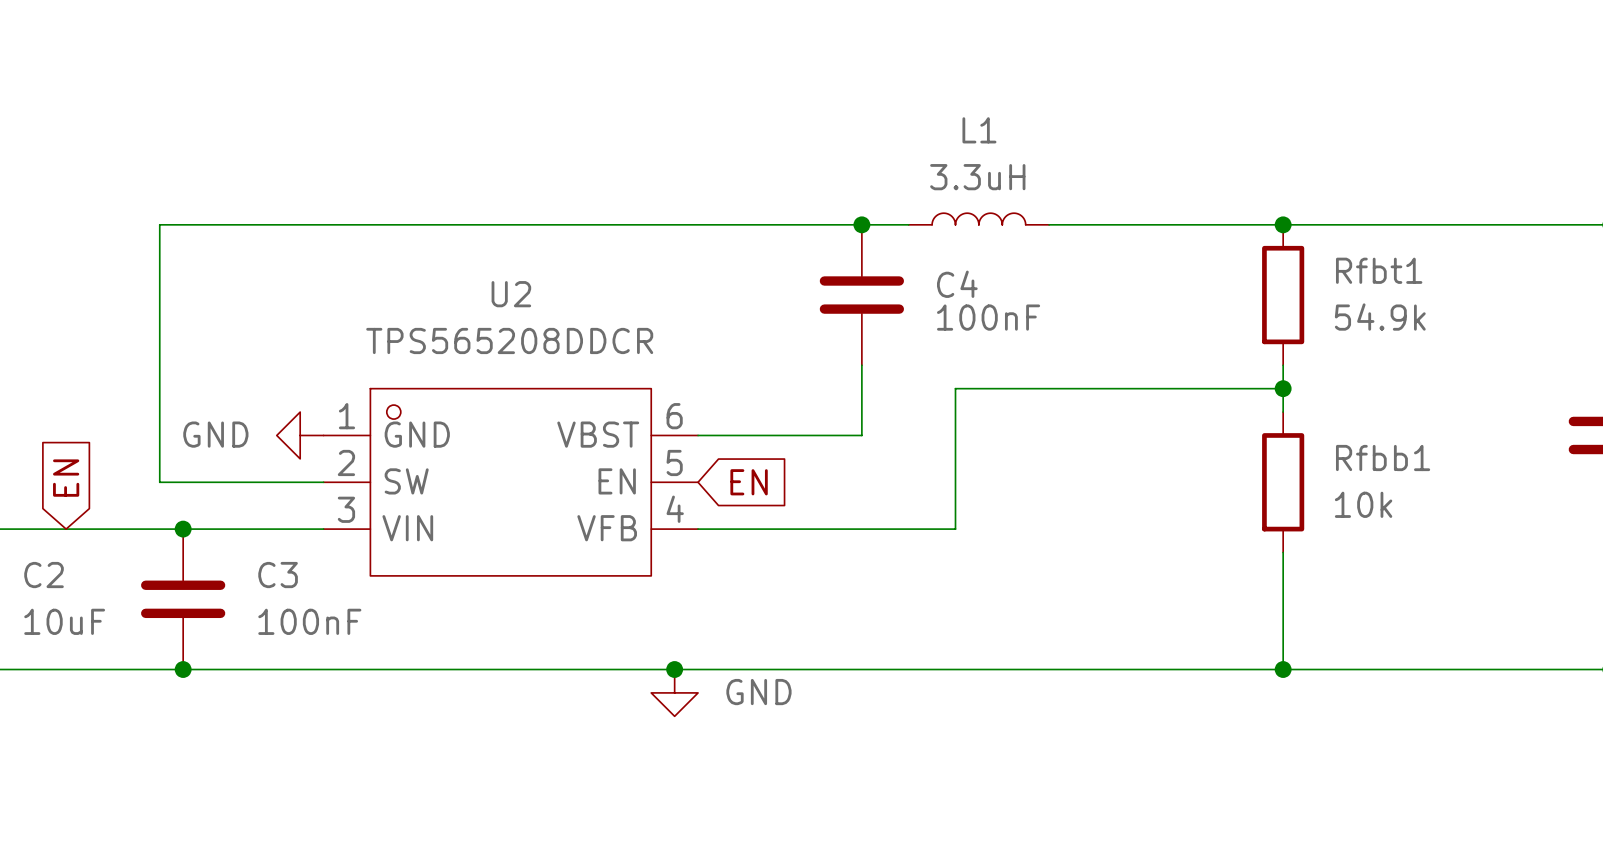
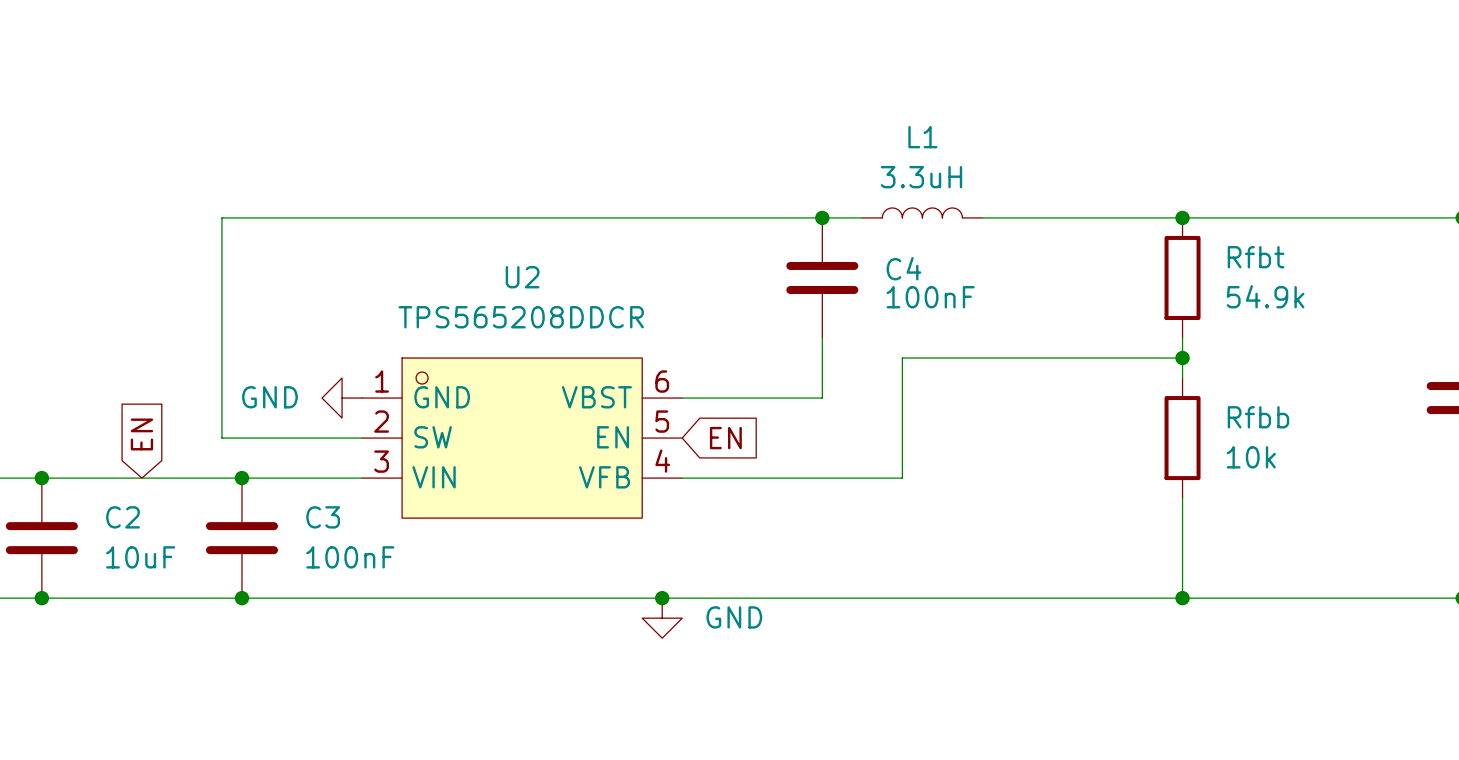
Rfbt1 name: Rfbt1 (1379, 270) -> Rfbt (1256, 257)
Rfbb1 name: Rfbb1 (1383, 458) -> Rfbb (1258, 417)

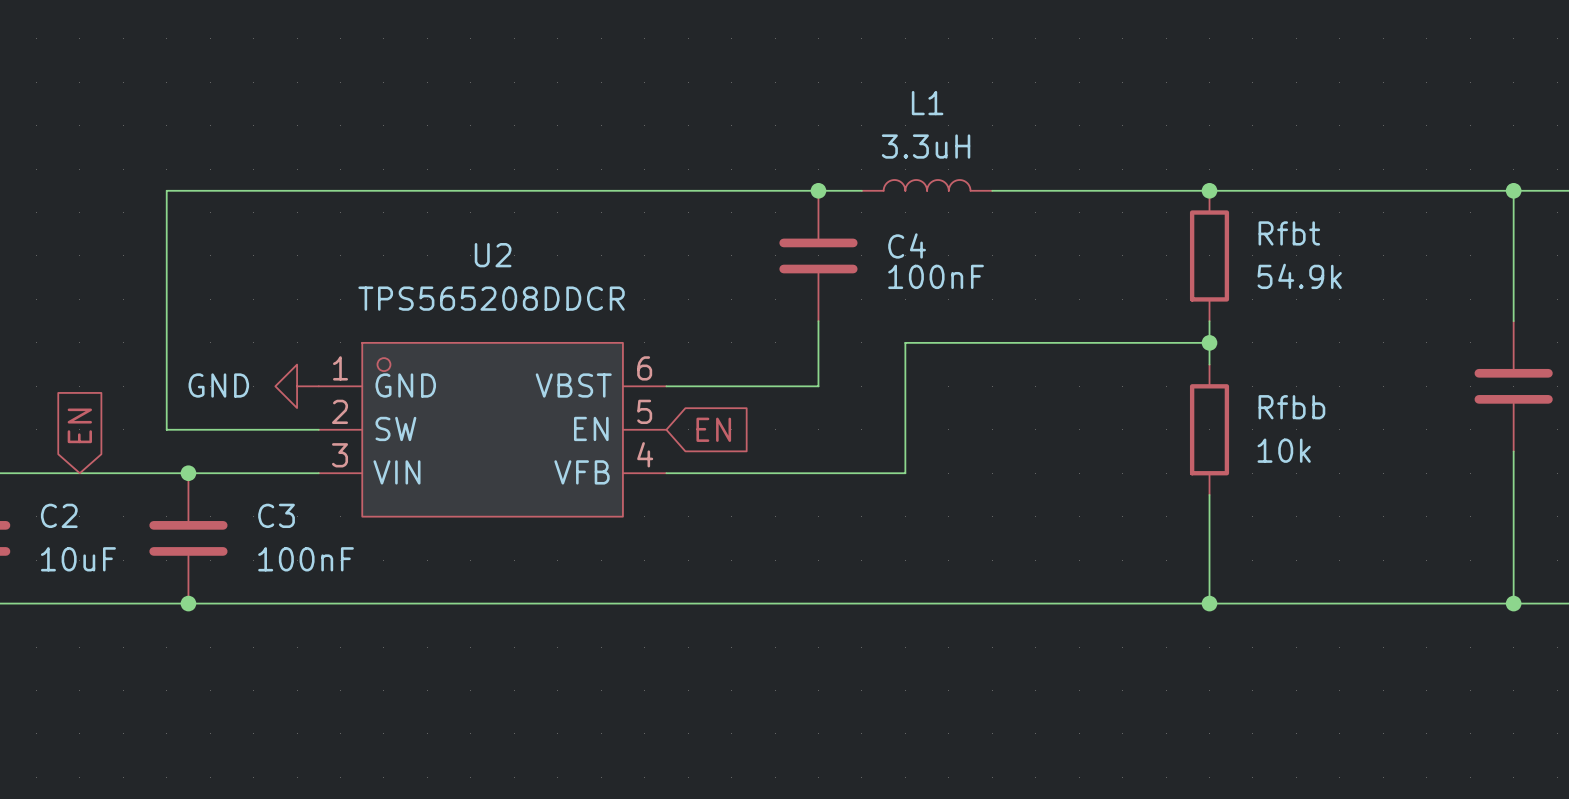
junction: (662, 598) -> none
power symbol: GND (662, 618) -> none

